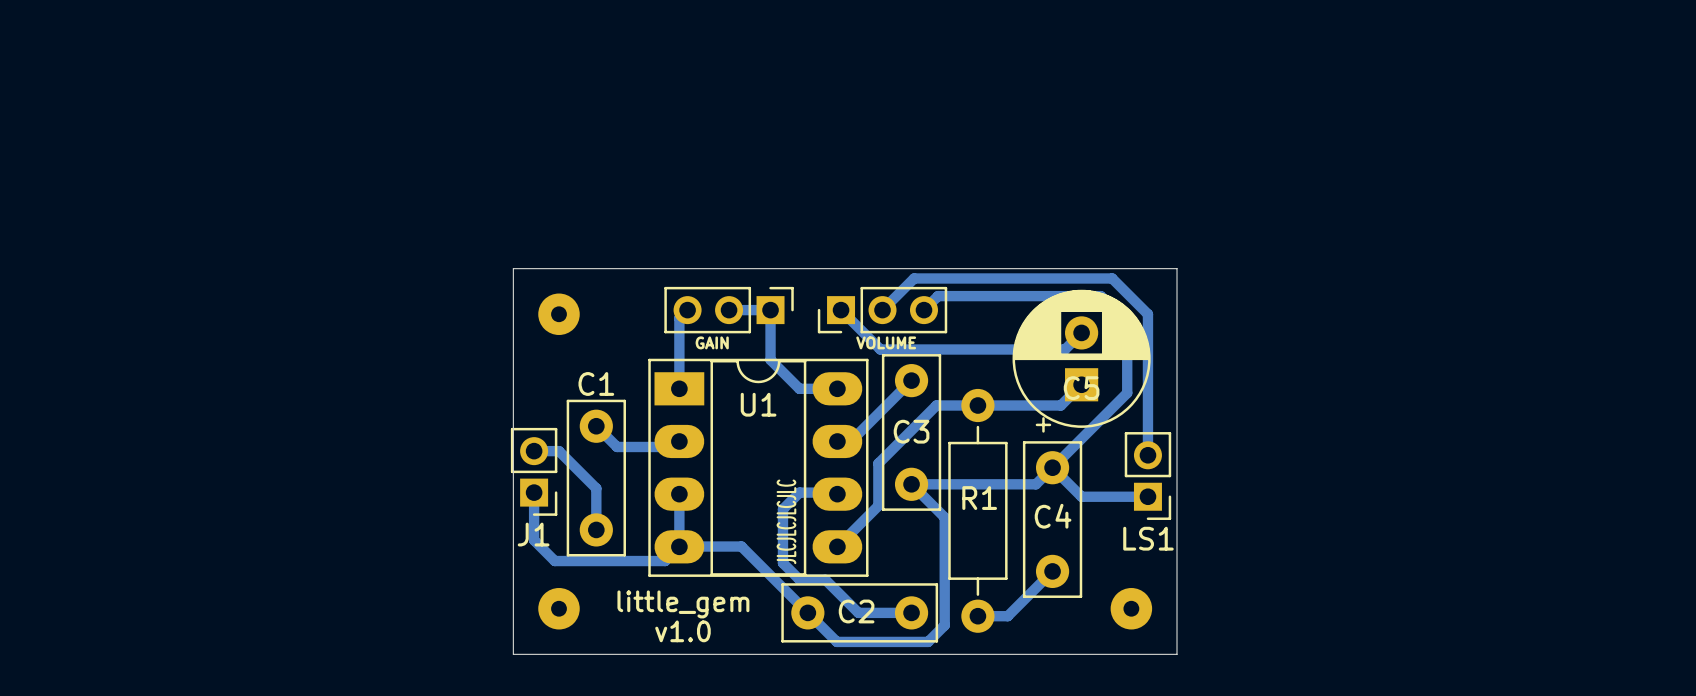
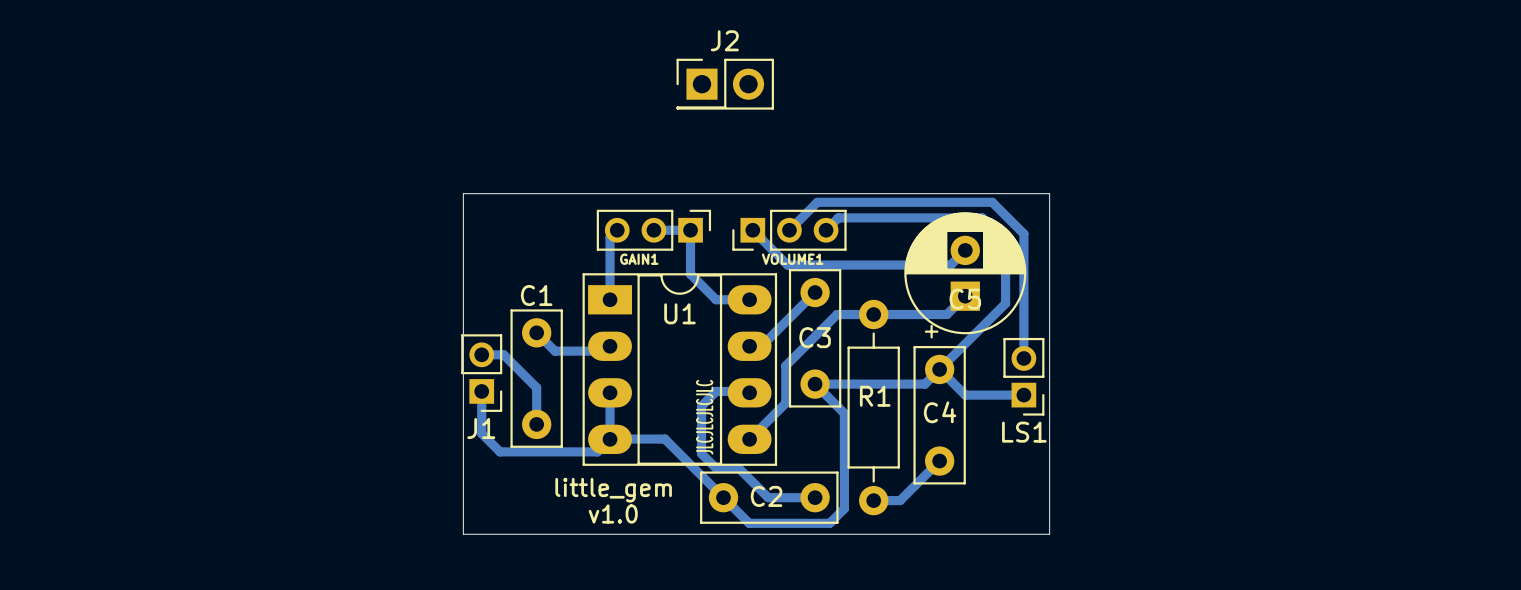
J2: none -> (725, 84)
part: (559, 314) -> none
GAIN name: GAIN (712, 342) -> GAIN1 (639, 259)
VOLUME name: VOLUME (886, 342) -> VOLUME1 (792, 259)
part: (559, 608) -> none
part: (1131, 608) -> none

